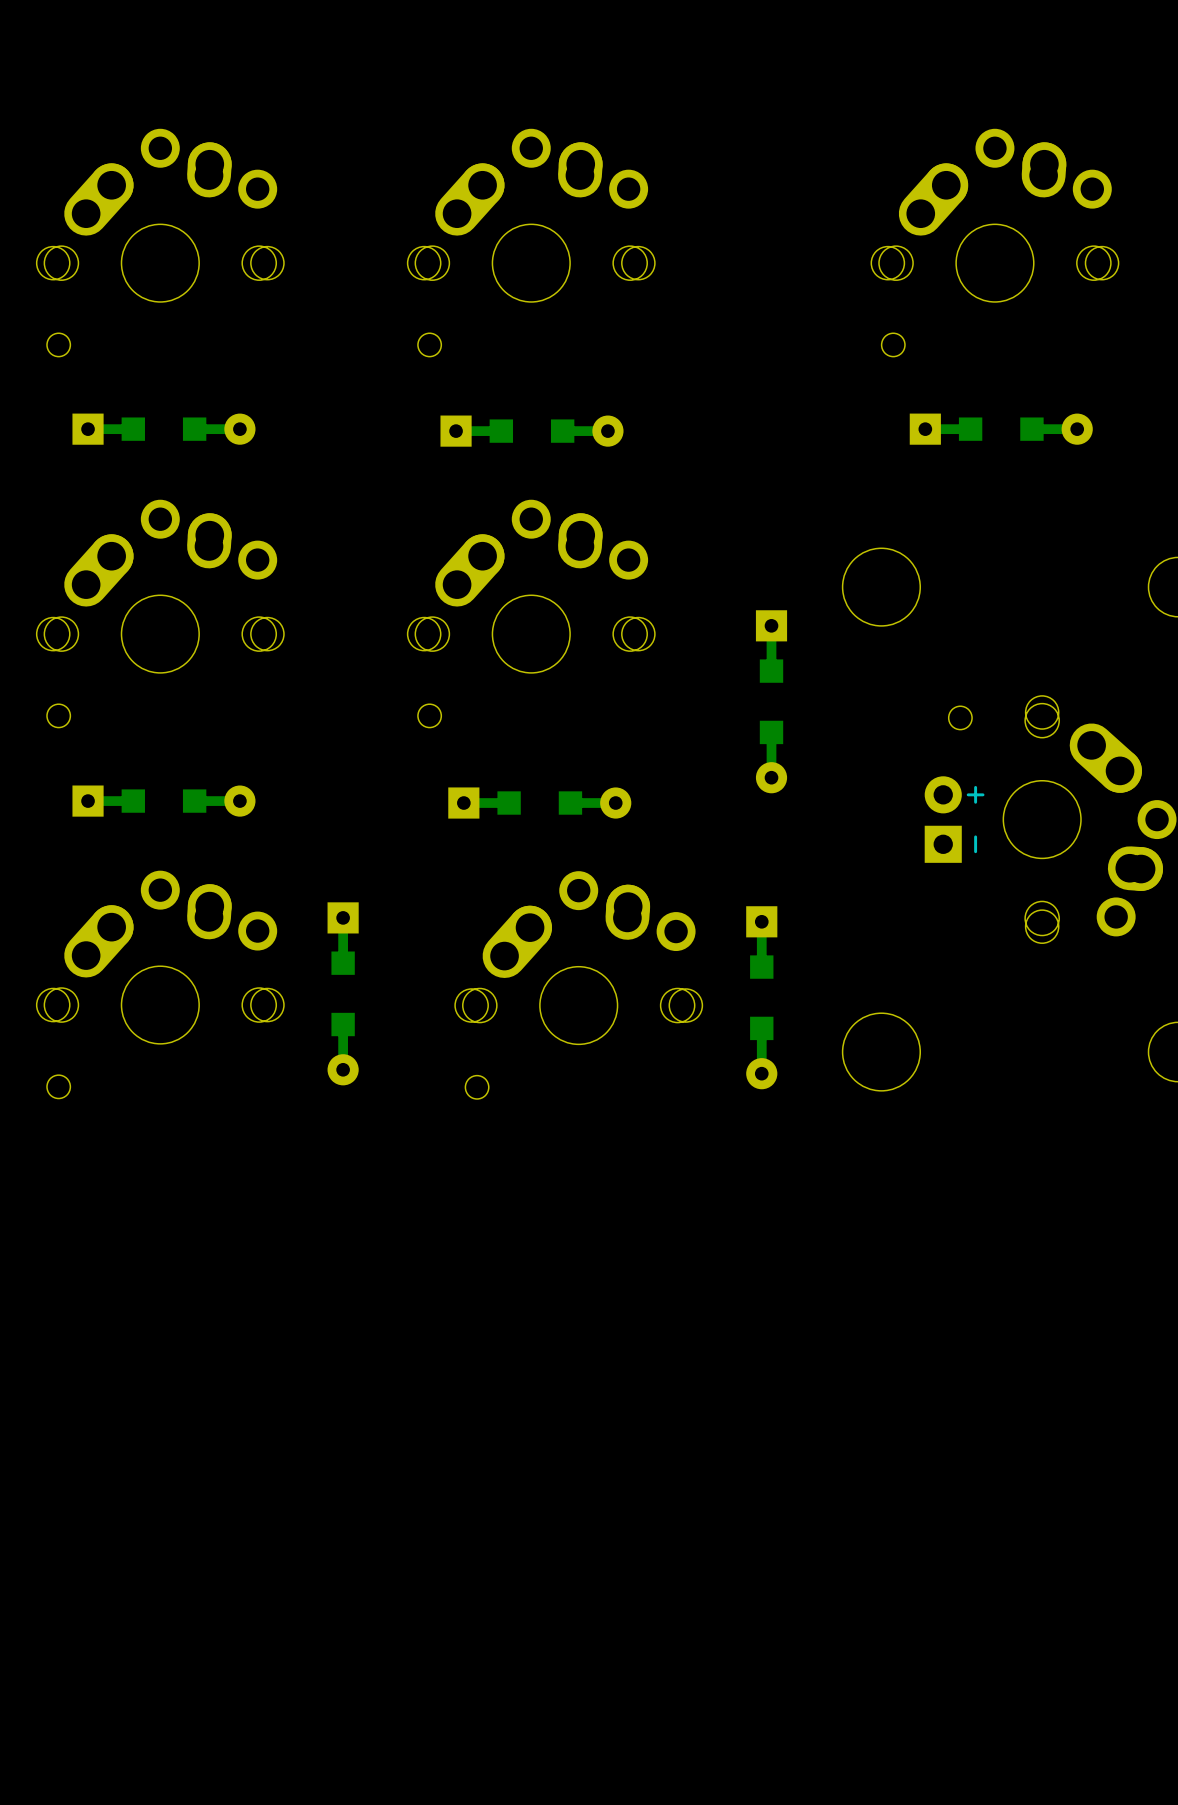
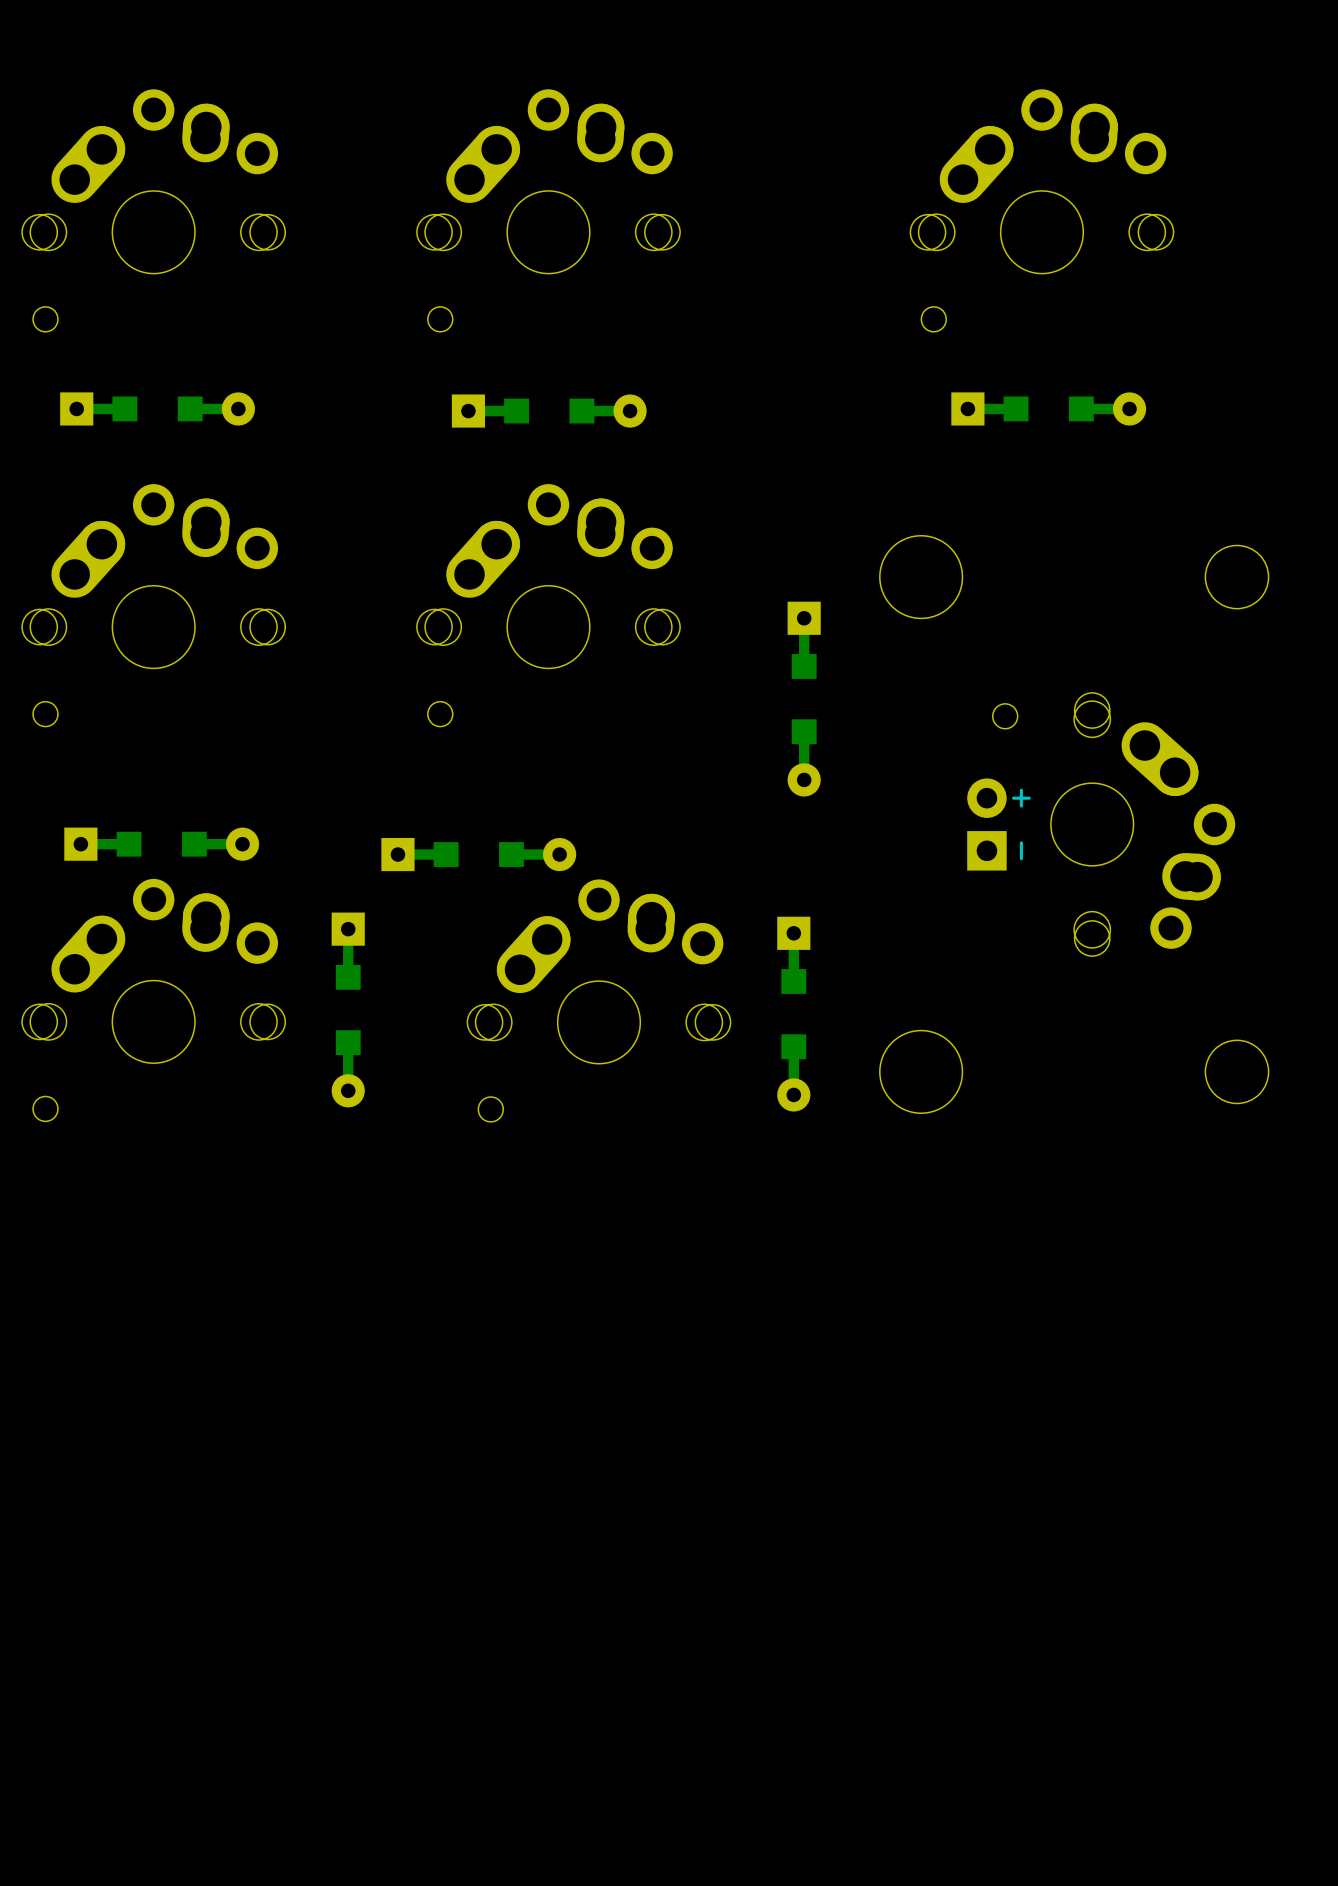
part position: (163, 801) -> (161, 844)
part position: (539, 803) -> (478, 854)

